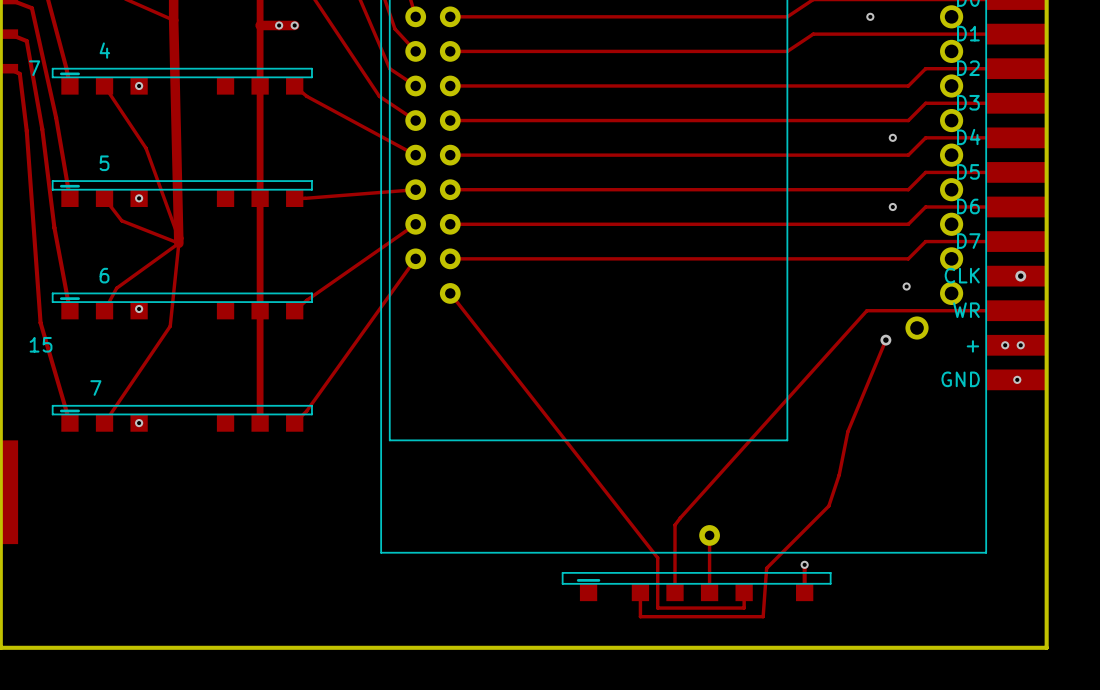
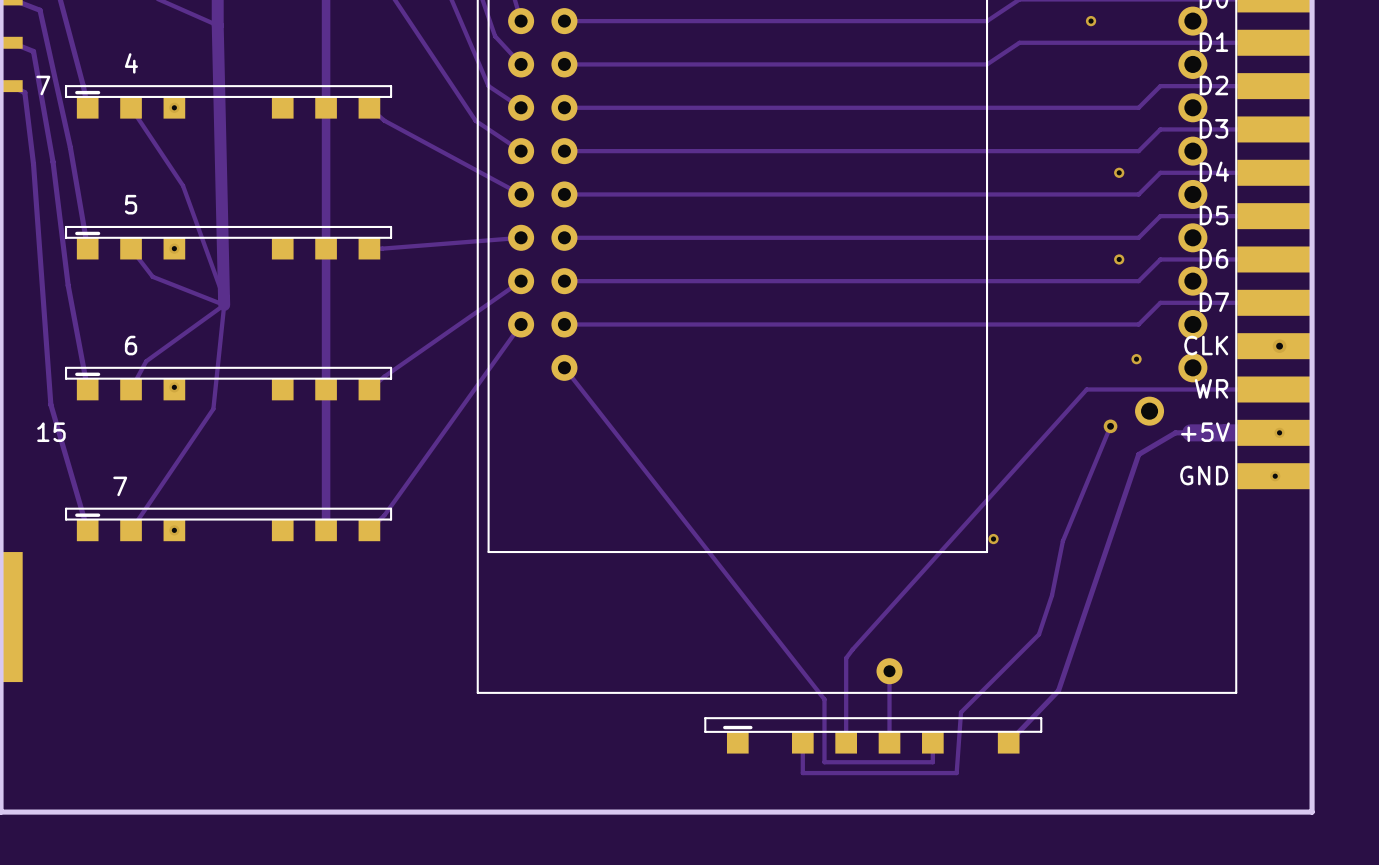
track: (260, 25) (294, 25) -> none
via: (279, 25) -> none
via: (294, 25) -> none
via: (1005, 345) -> none
part text: + (972, 346) -> +5V (1205, 432)
via: none -> (993, 539)
track: (804, 564) (804, 592) -> (1279, 432) (1175, 432) (1138, 454) (1058, 690) (1008, 742)
via: (804, 564) -> none

